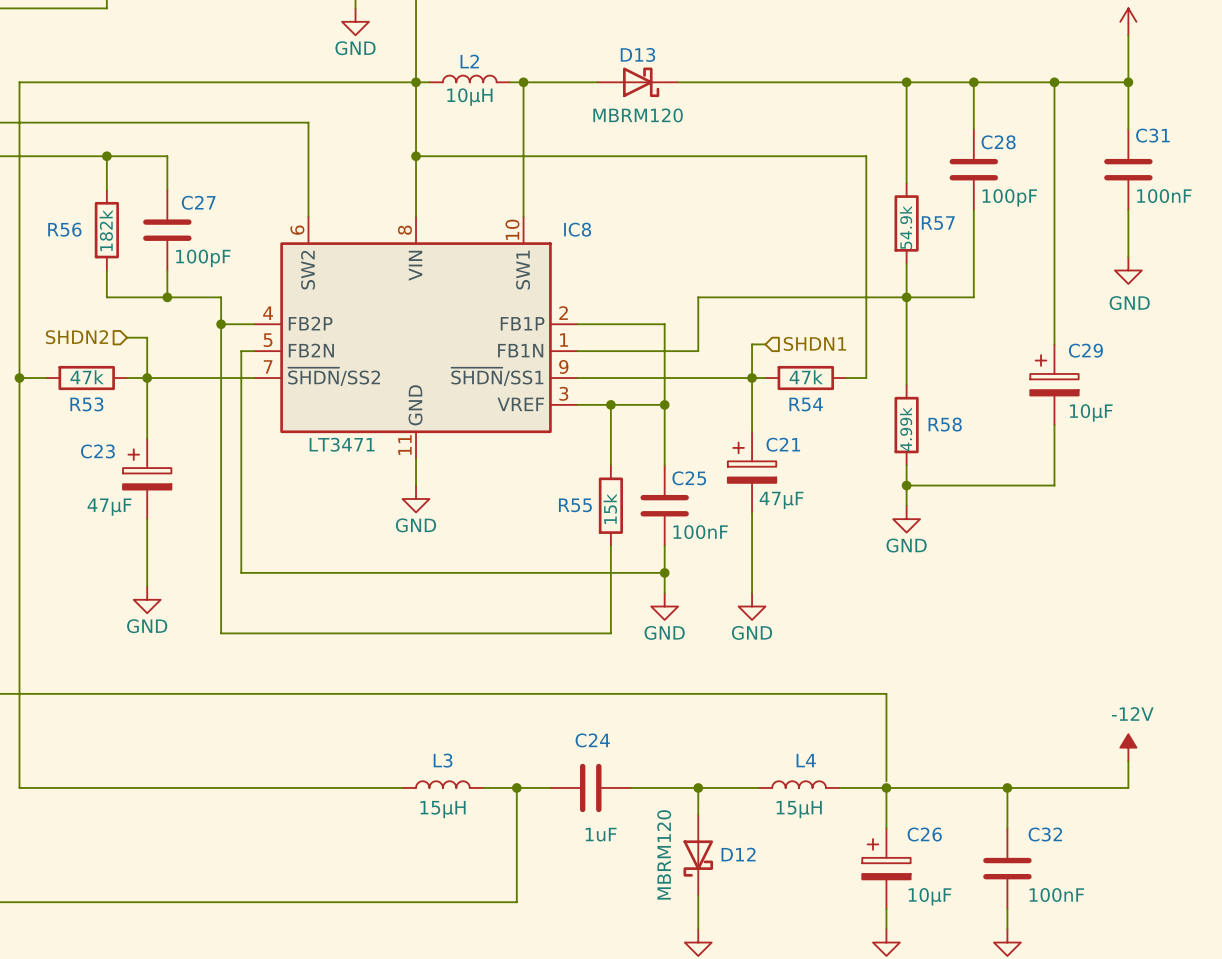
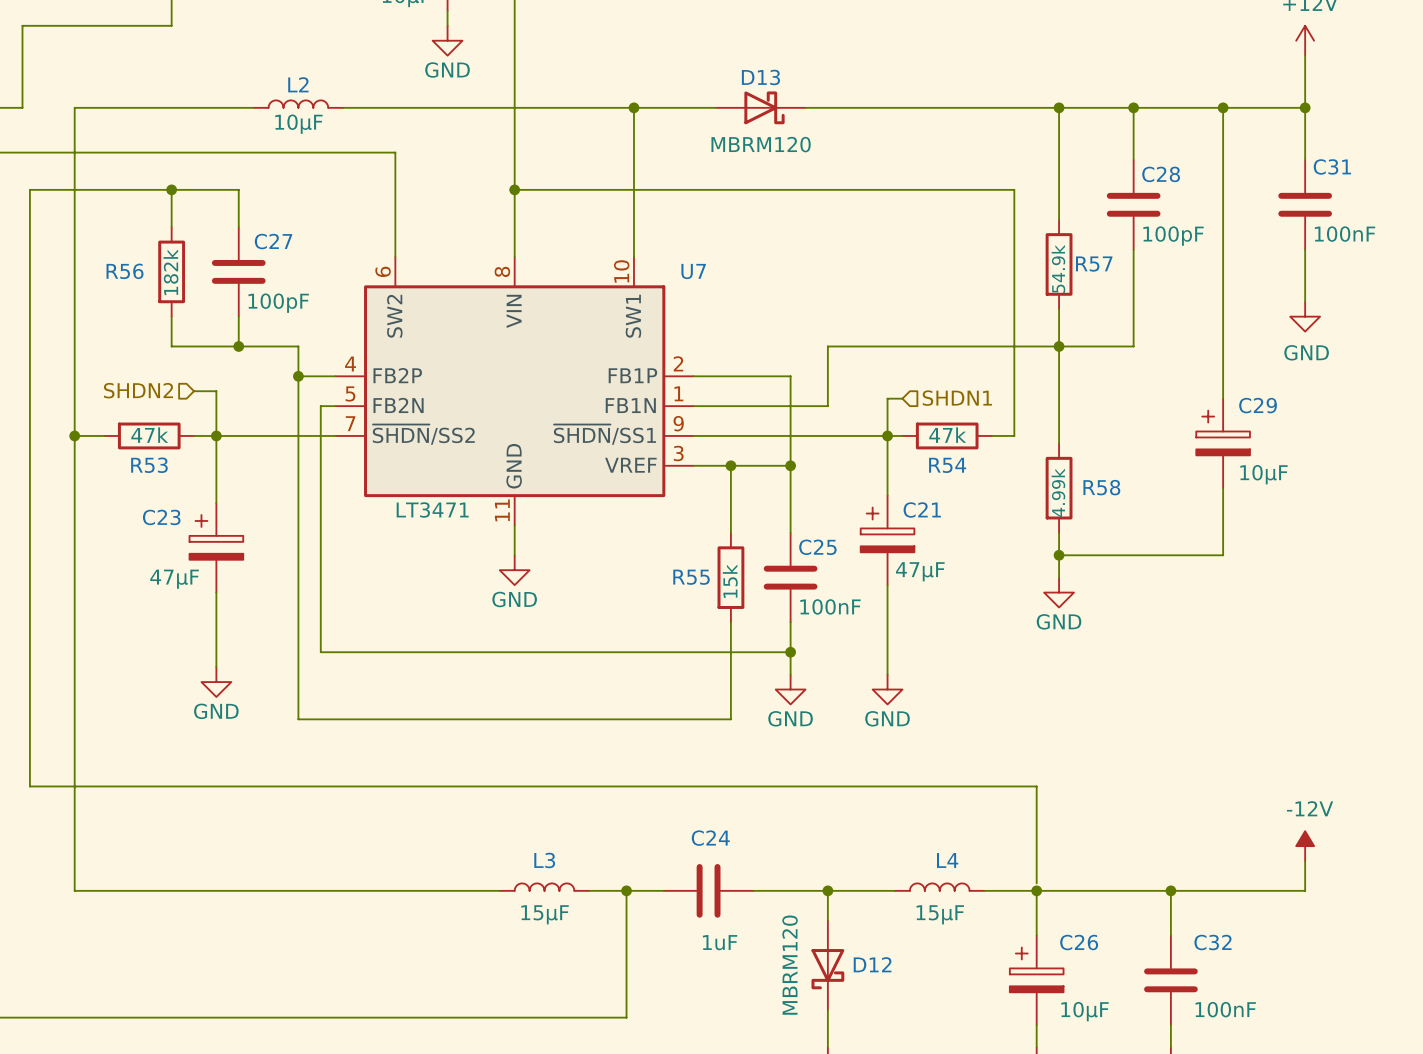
L2 position: (469, 78) -> (298, 104)
wire: (180, 82) (261, 82) -> (529, 107) (619, 107)
junction: (416, 82) -> none
L2 value: 10μH (469, 97) -> 10μF (298, 124)
IC8 name: IC8 (577, 229) -> U7 (693, 271)
L3 value: 15μH (443, 809) -> 15μF (545, 914)
L4 value: 15μH (799, 809) -> 15μF (940, 914)

